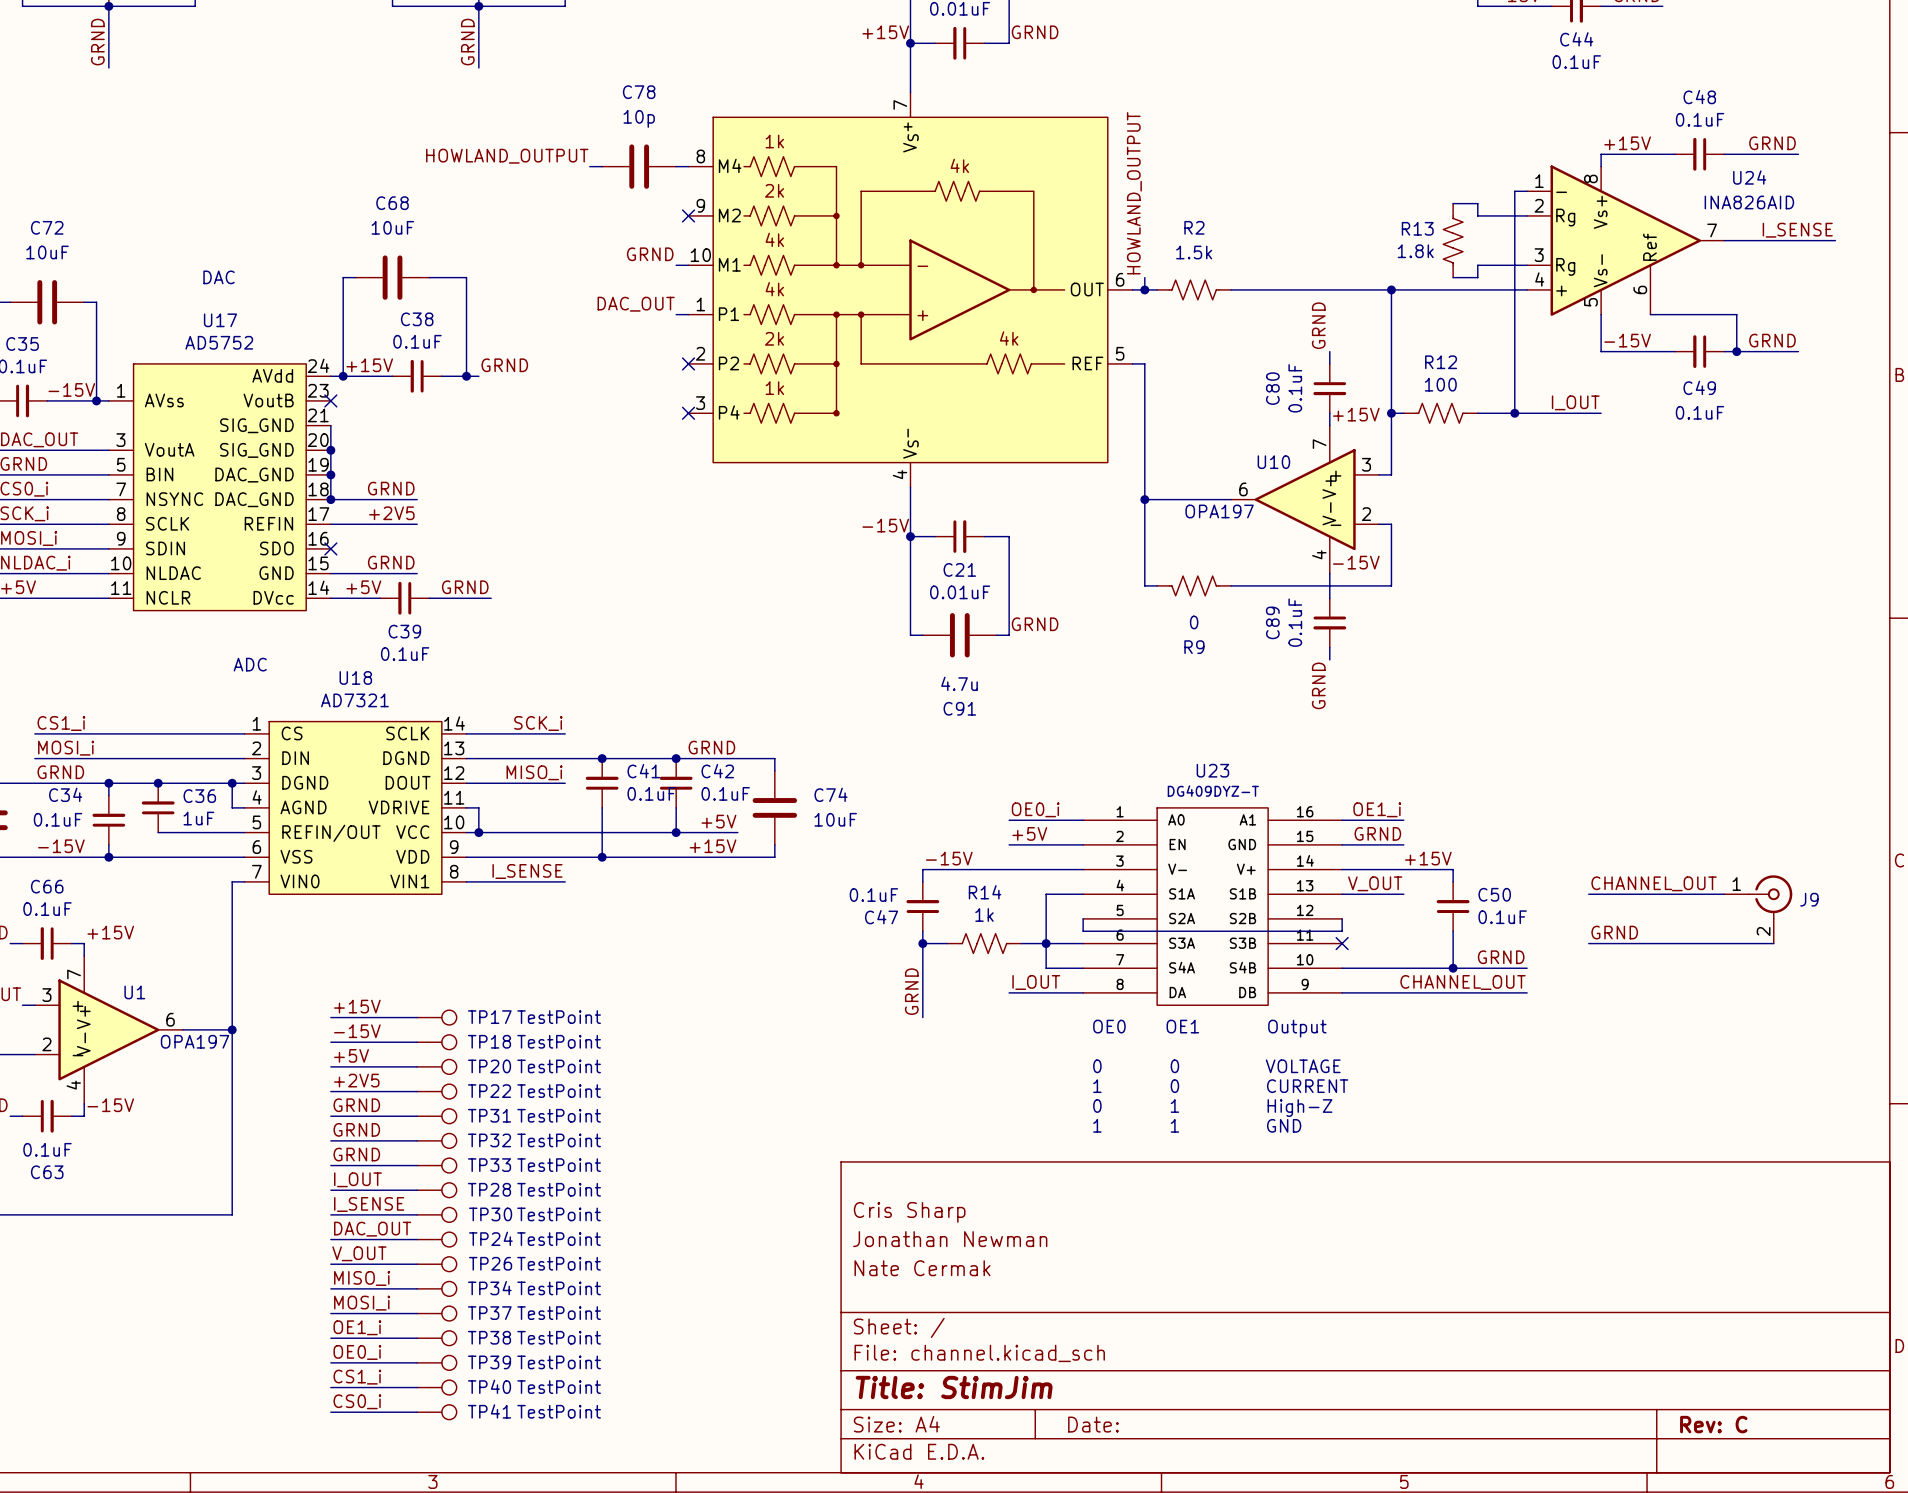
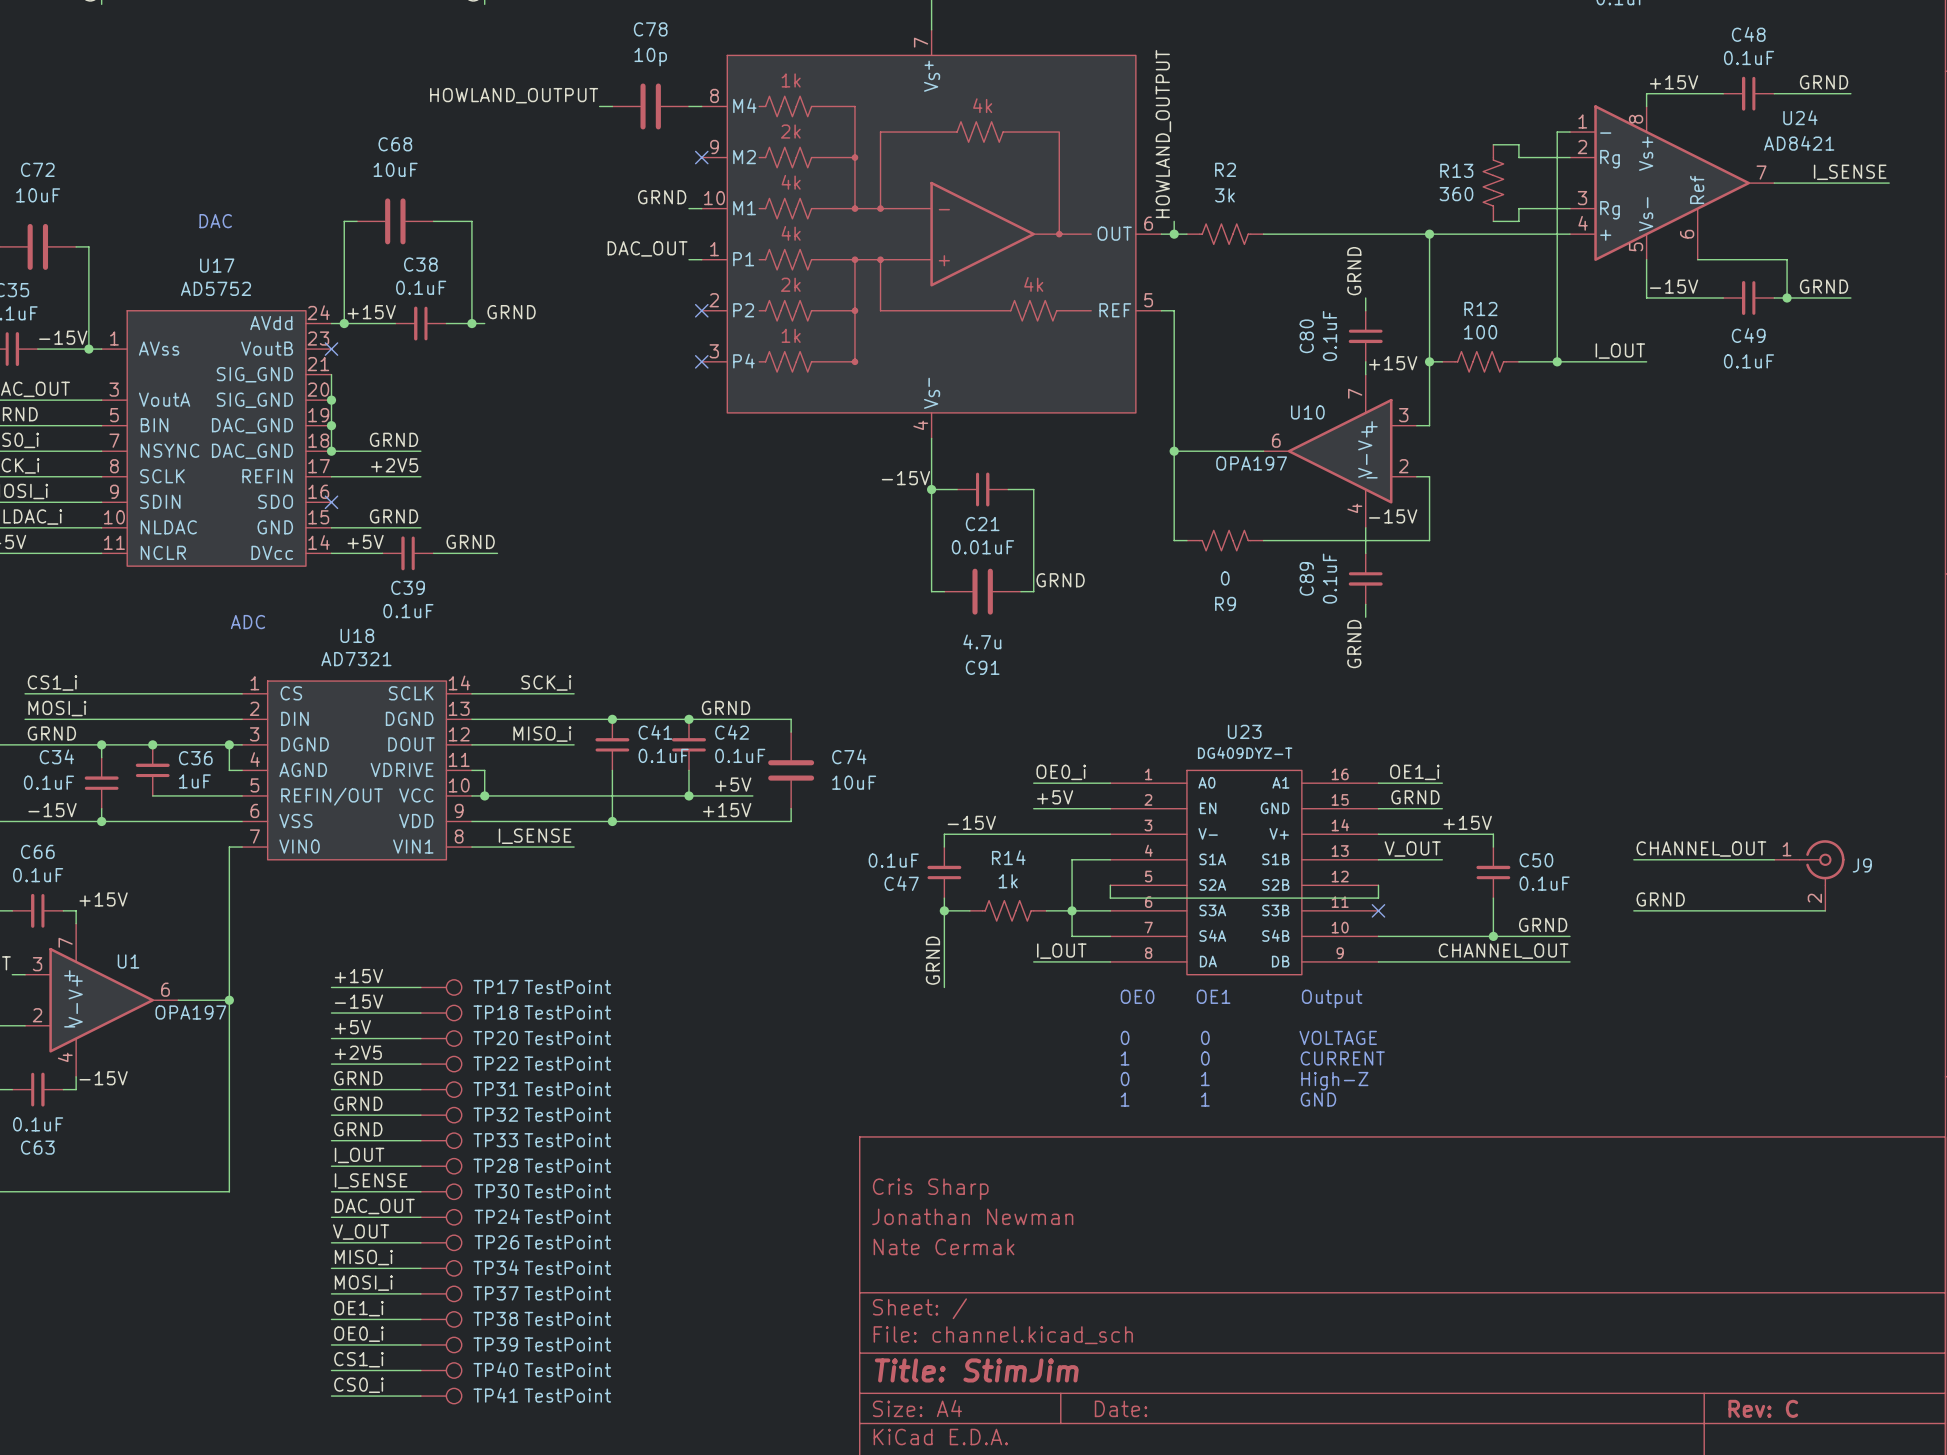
U24 value: INA826AID (1749, 202) -> AD8421 (1799, 143)
R13 value: 1.8k (1415, 251) -> 360 (1456, 194)
R2 value: 1.5k (1194, 252) -> 3k (1224, 195)

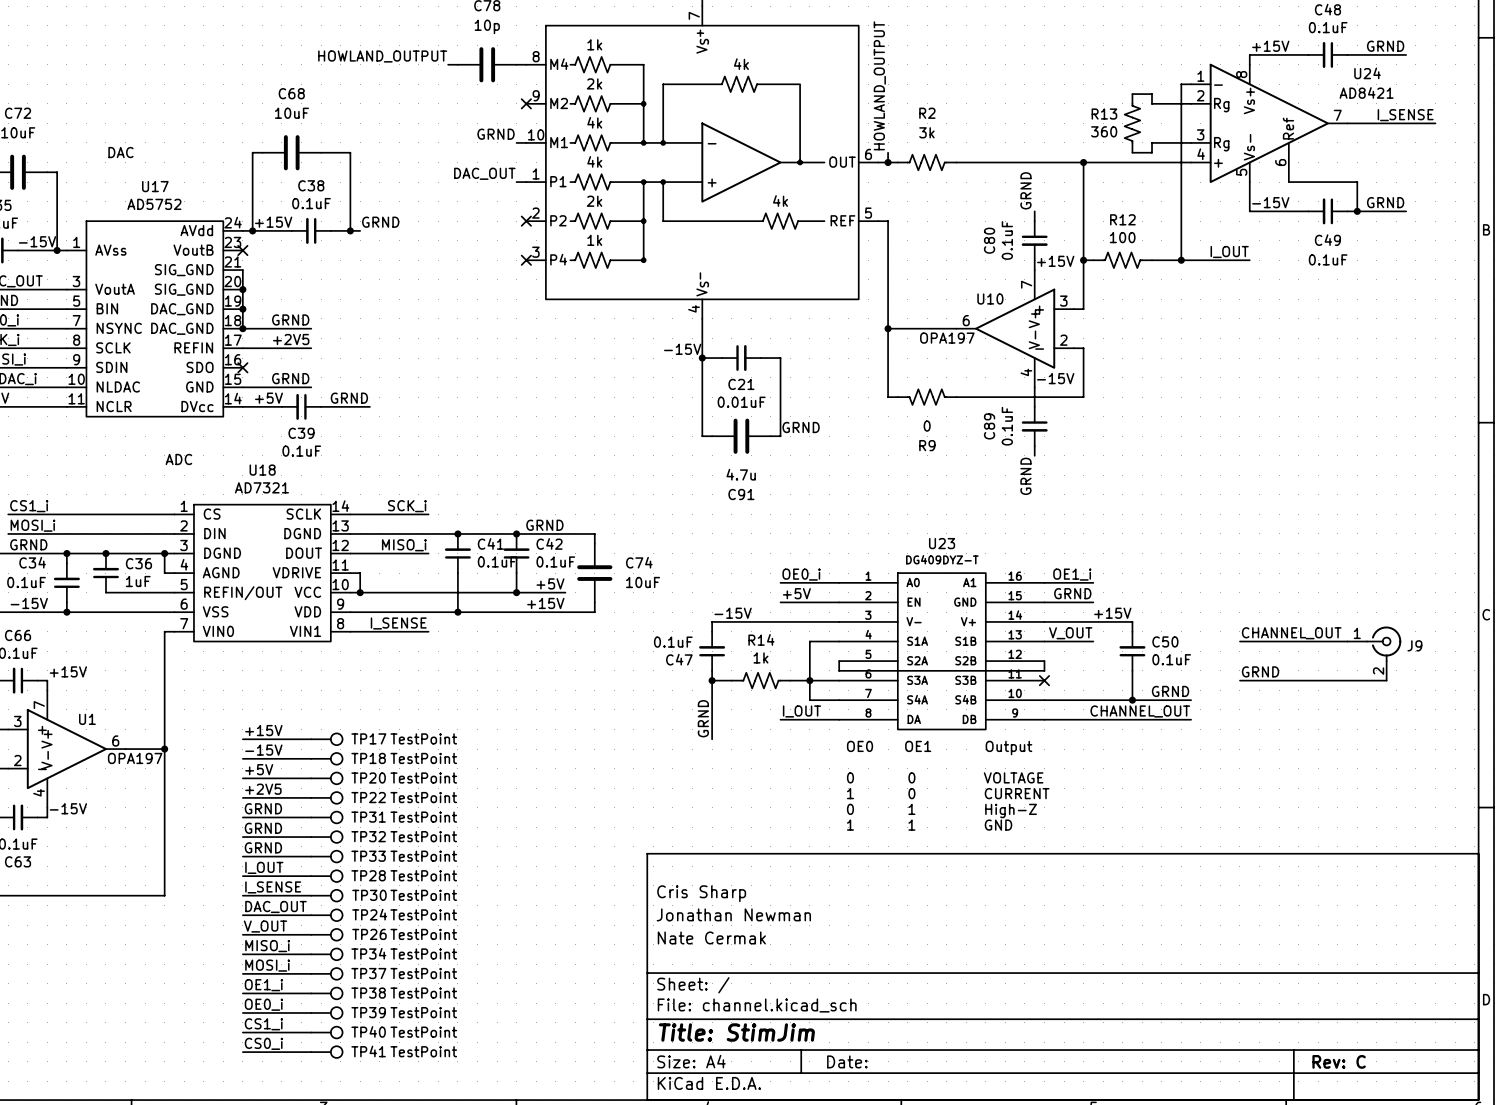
text position: DAC (215, 221) -> DAC (120, 152)

